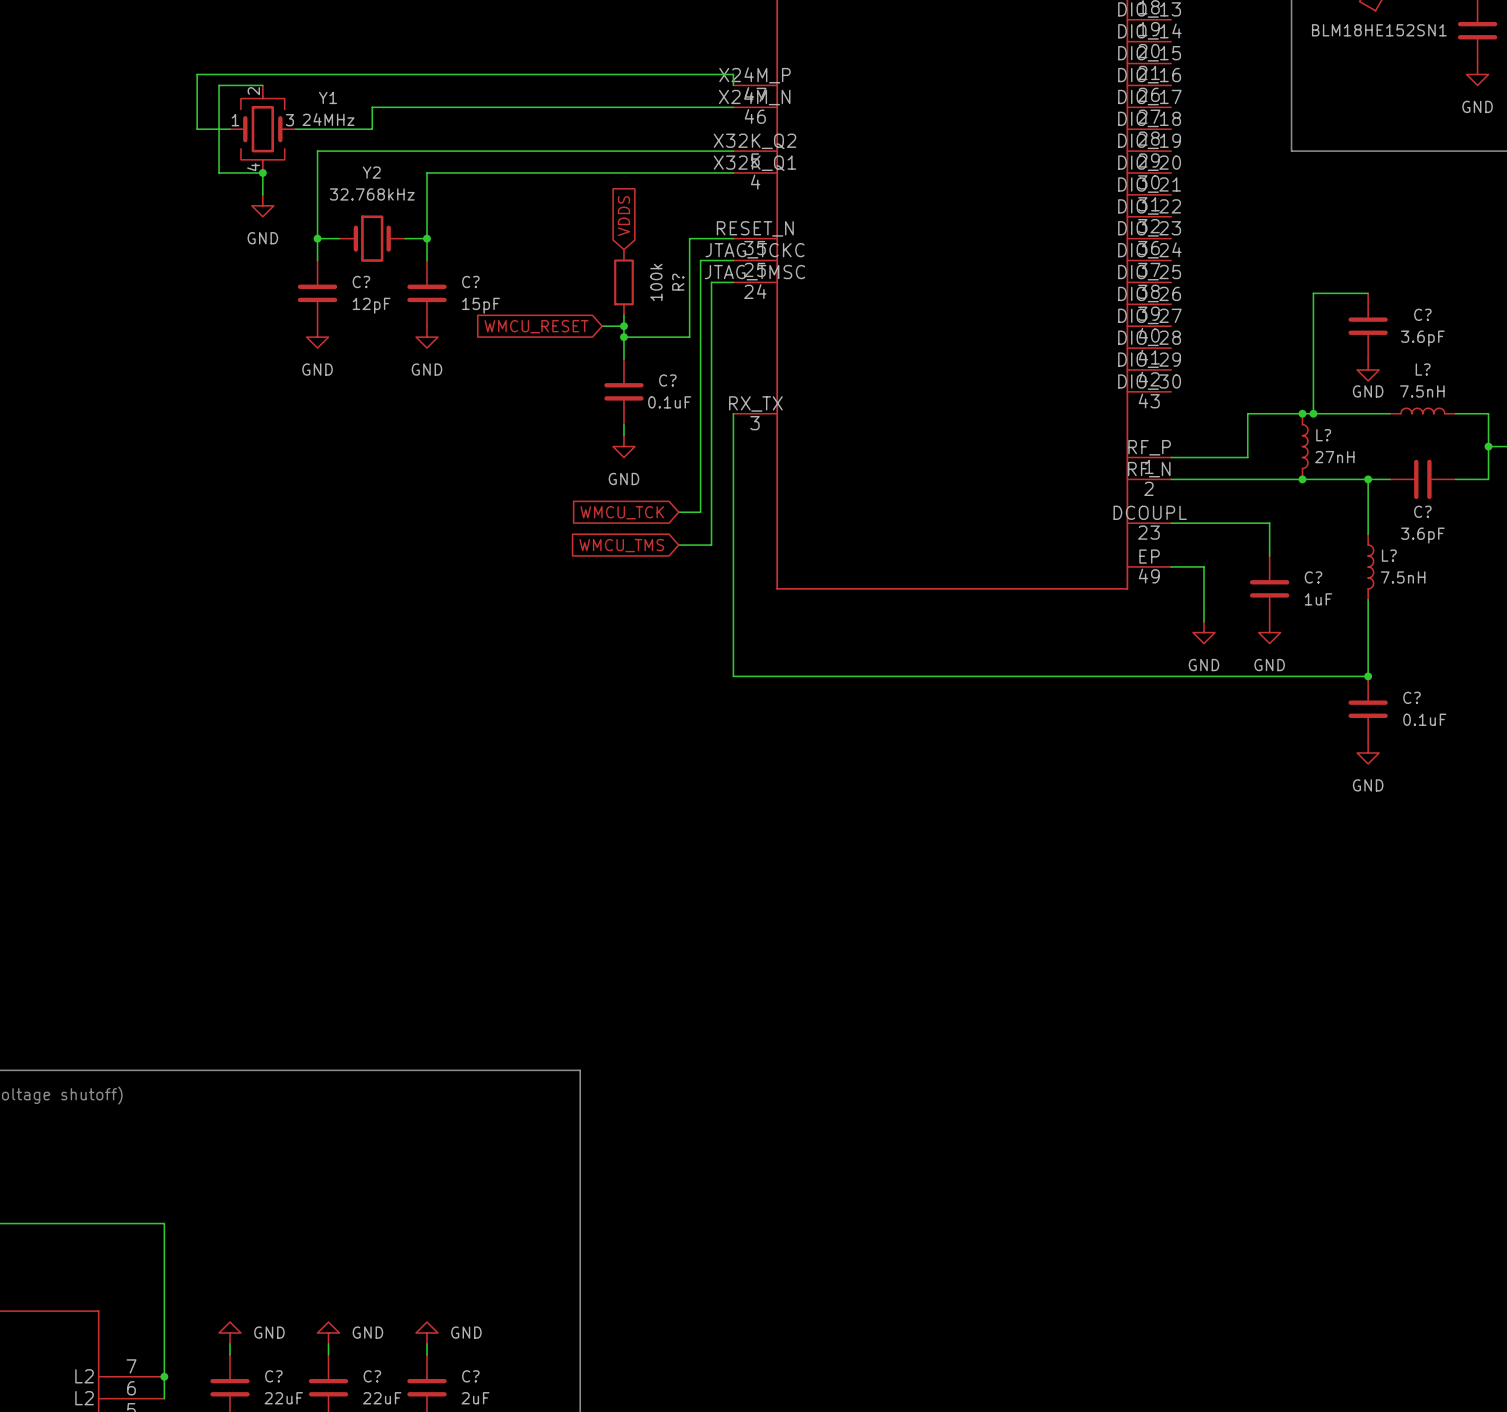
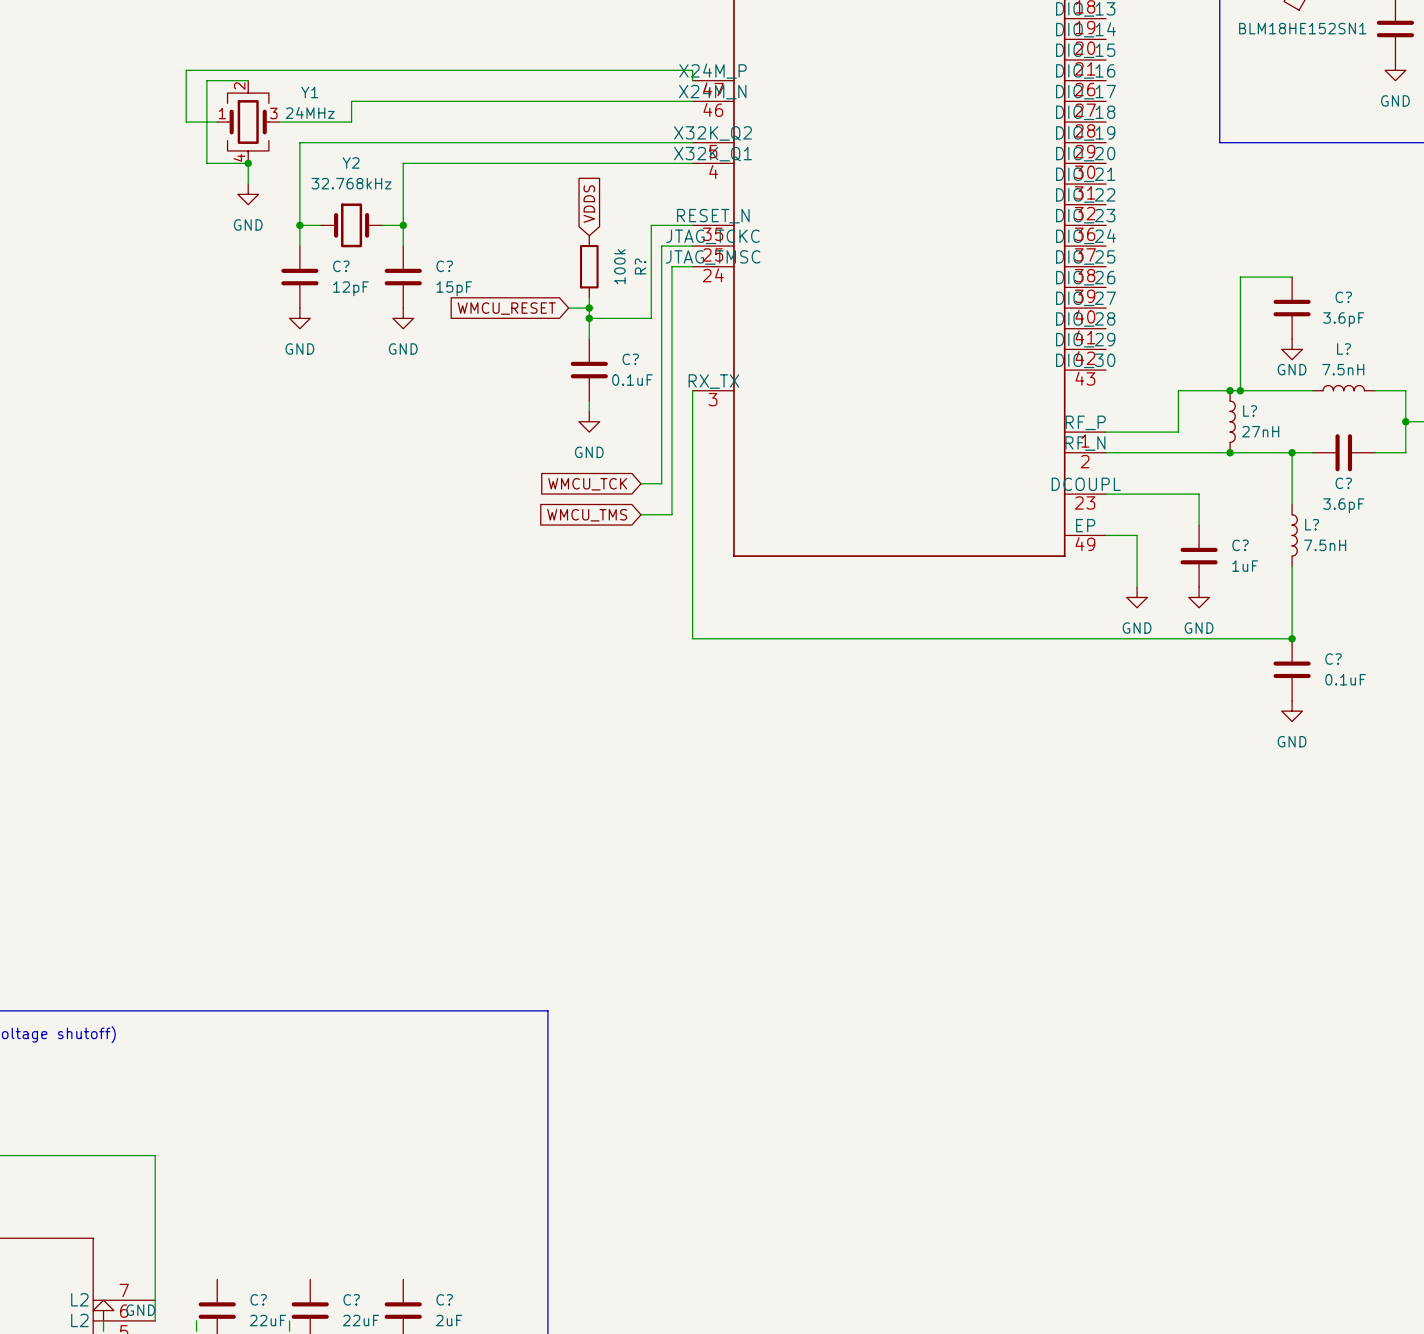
power symbol: GND (230, 1333) -> none
power symbol: GND (328, 1333) -> none
power symbol: GND (426, 1333) -> none
wire: (230, 1343) (230, 1354) -> (103, 1320) (103, 1331)
wire: (328, 1343) (328, 1354) -> (196, 1320) (196, 1331)
wire: (426, 1343) (426, 1354) -> (289, 1320) (289, 1331)
junction: (164, 1376) -> none
power symbol: none -> GND (103, 1310)

